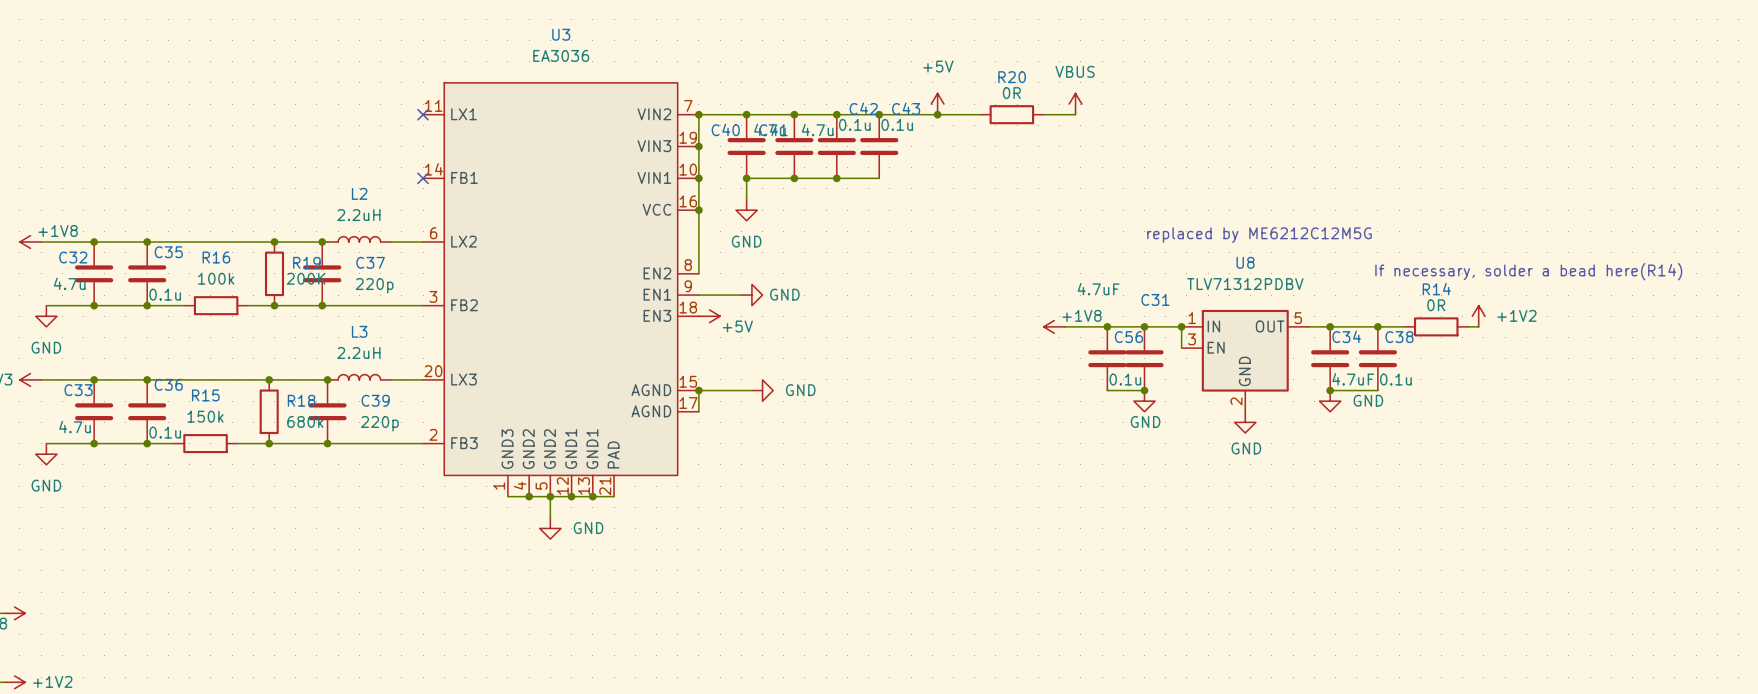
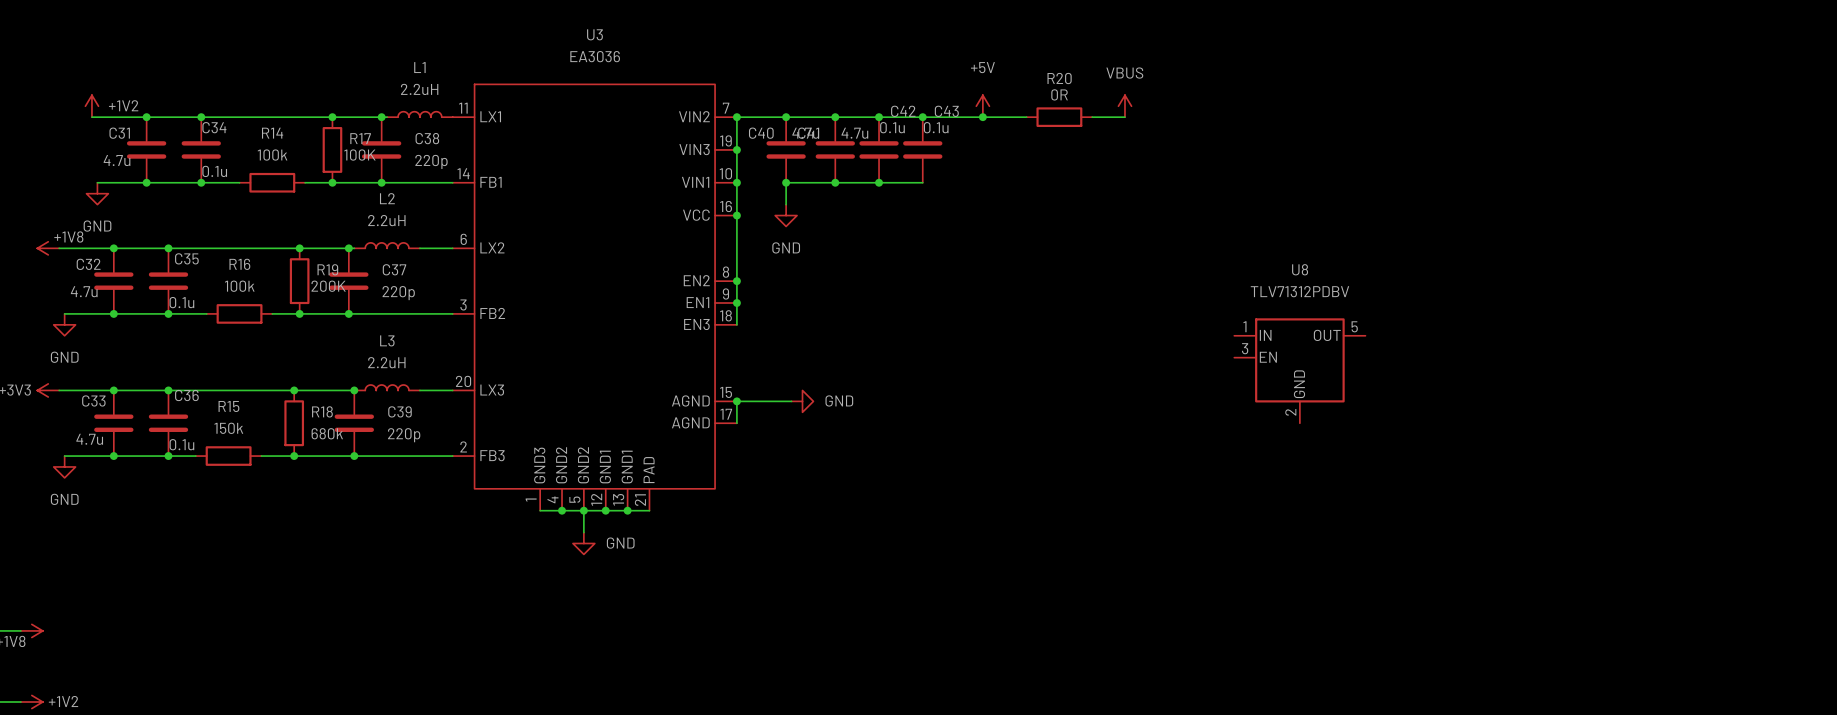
power symbol: none -> +1V2 (91, 106)
L1: none -> 2.2uH (419, 114)
wire: none -> (91, 117) (387, 117)
junction: none -> (146, 117)
junction: none -> (201, 117)
junction: none -> (332, 117)
junction: none -> (381, 117)
no-connect mark: (423, 114) -> none
R17: none -> 100K (332, 149)
wire: none -> (97, 182) (239, 182)
junction: none -> (146, 182)
junction: none -> (201, 182)
wire: none -> (305, 182) (452, 182)
junction: none -> (332, 182)
junction: none -> (381, 182)
no-connect mark: (423, 178) -> none
power symbol: none -> GND (97, 193)
text: replaced by ME6212C12M5G (1259, 235) -> none
text: If necessary, solder a bead here(R14) (1528, 271) -> none
wire: none -> (736, 281) (736, 324)
junction: none -> (736, 281)
C31 value: 4.7uF (1098, 289) -> 4.7u (117, 160)
R14 name position: R14 (1436, 289) -> R14 (272, 133)
wire: (698, 295) (741, 295) -> none
junction: none -> (736, 303)
power symbol: GND (751, 295) -> none
C31 name position: C31 (1155, 299) -> C31 (119, 133)
R14 value: 0R (1436, 305) -> 100k (272, 155)
power symbol: +5V (709, 316) -> none
power symbol: +1V2 (1478, 316) -> none
power symbol: +1V8 (1054, 326) -> none
wire: (1064, 326) (1181, 326) (1181, 348) -> none
junction: (1107, 326) -> none
junction: (1144, 326) -> none
junction: (1181, 326) -> none
wire: (1308, 326) (1404, 326) -> none
junction: (1330, 326) -> none
junction: (1377, 326) -> none
R14 position: (1436, 326) -> (272, 182)
wire: (1468, 326) (1478, 326) -> none
C38 name position: C38 (1399, 337) -> C38 (427, 138)
C56: 0.1u (1107, 358) -> none
C31 position: (1144, 358) -> (146, 149)
C34 position: (1330, 358) -> (201, 149)
C38 position: (1377, 358) -> (381, 149)
C34 value: 4.7uF (1353, 379) -> 0.1u (214, 171)
C38 value: 0.1u (1395, 379) -> 220p (431, 161)
wire: (1107, 390) (1144, 390) -> none
junction: (1144, 390) -> none
wire: (1330, 390) (1377, 390) -> none
junction: (1330, 390) -> none
power symbol: GND (1144, 401) -> none
power symbol: GND (1330, 401) -> none
power symbol: GND (1245, 422) -> none

